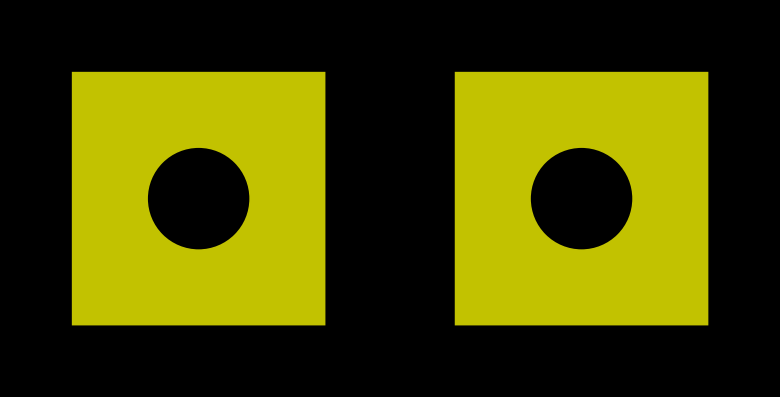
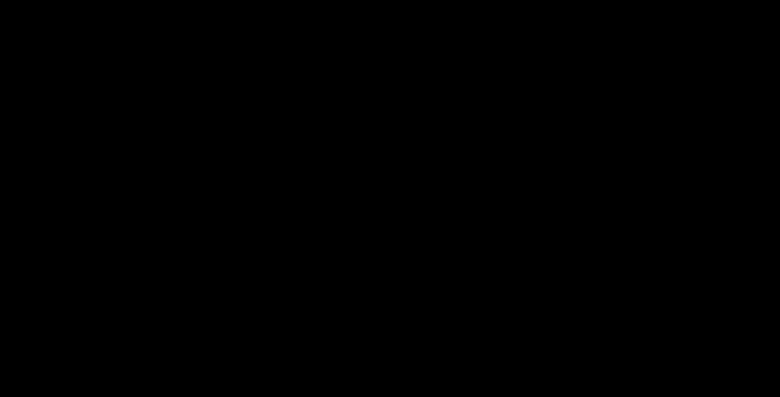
part: (198, 198) -> none
part: (581, 198) -> none

